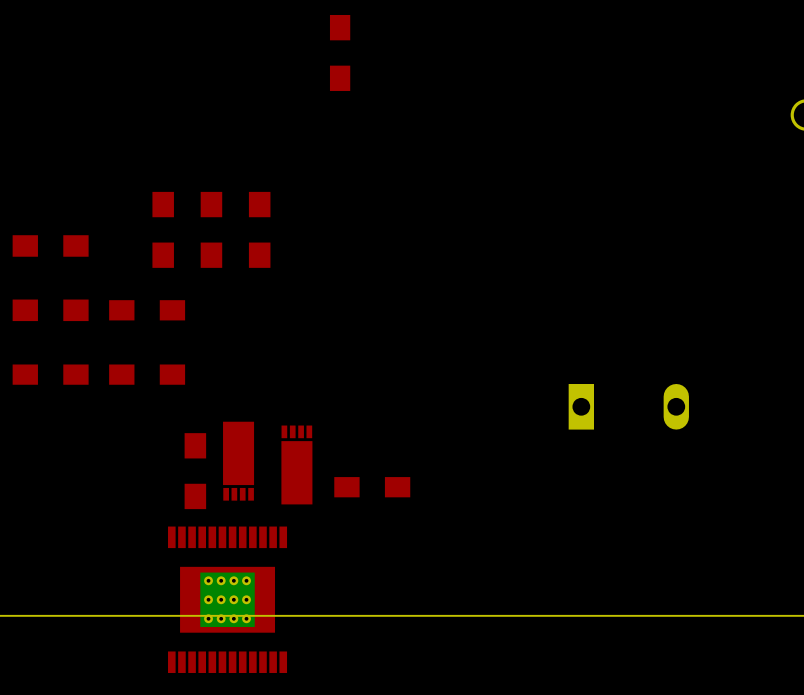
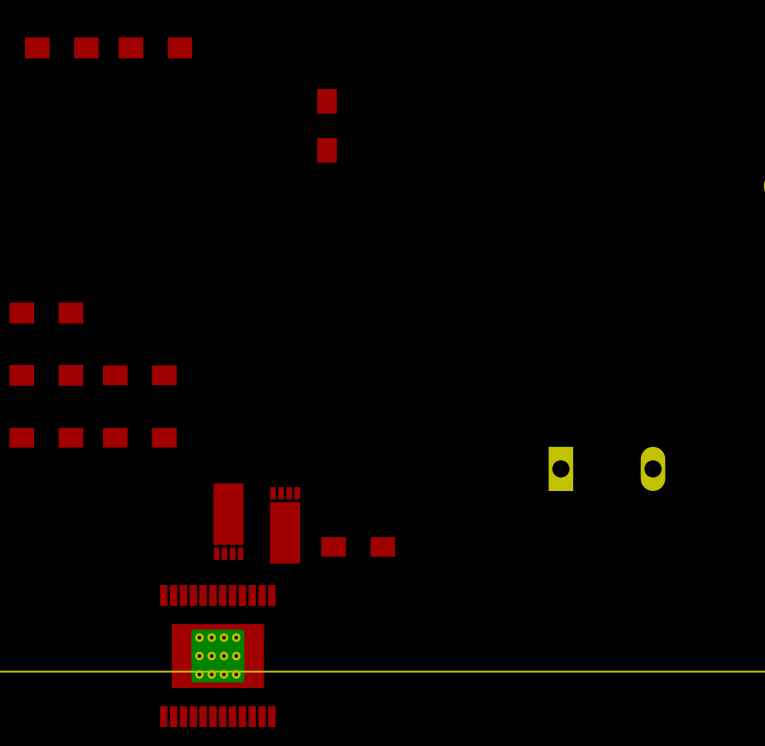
part: (163, 229) -> none
part: (211, 229) -> none
part: (259, 229) -> none
part: (195, 471) -> none

